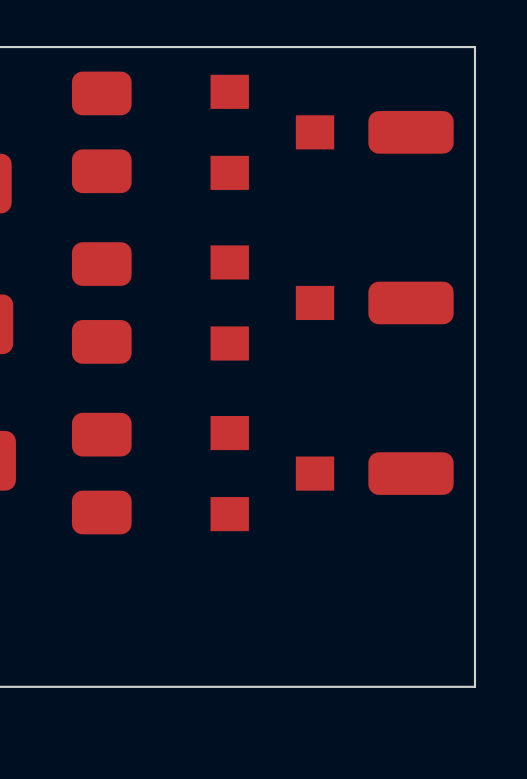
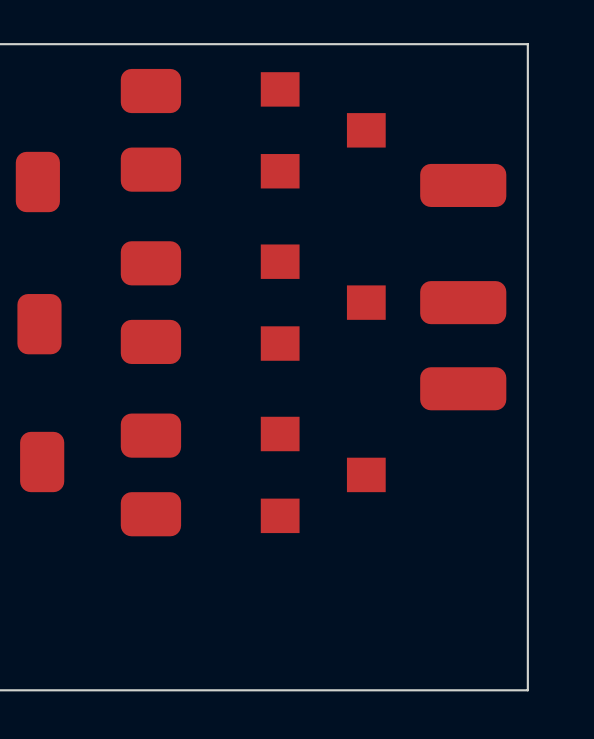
part position: (411, 132) -> (463, 185)
part position: (411, 473) -> (463, 388)

